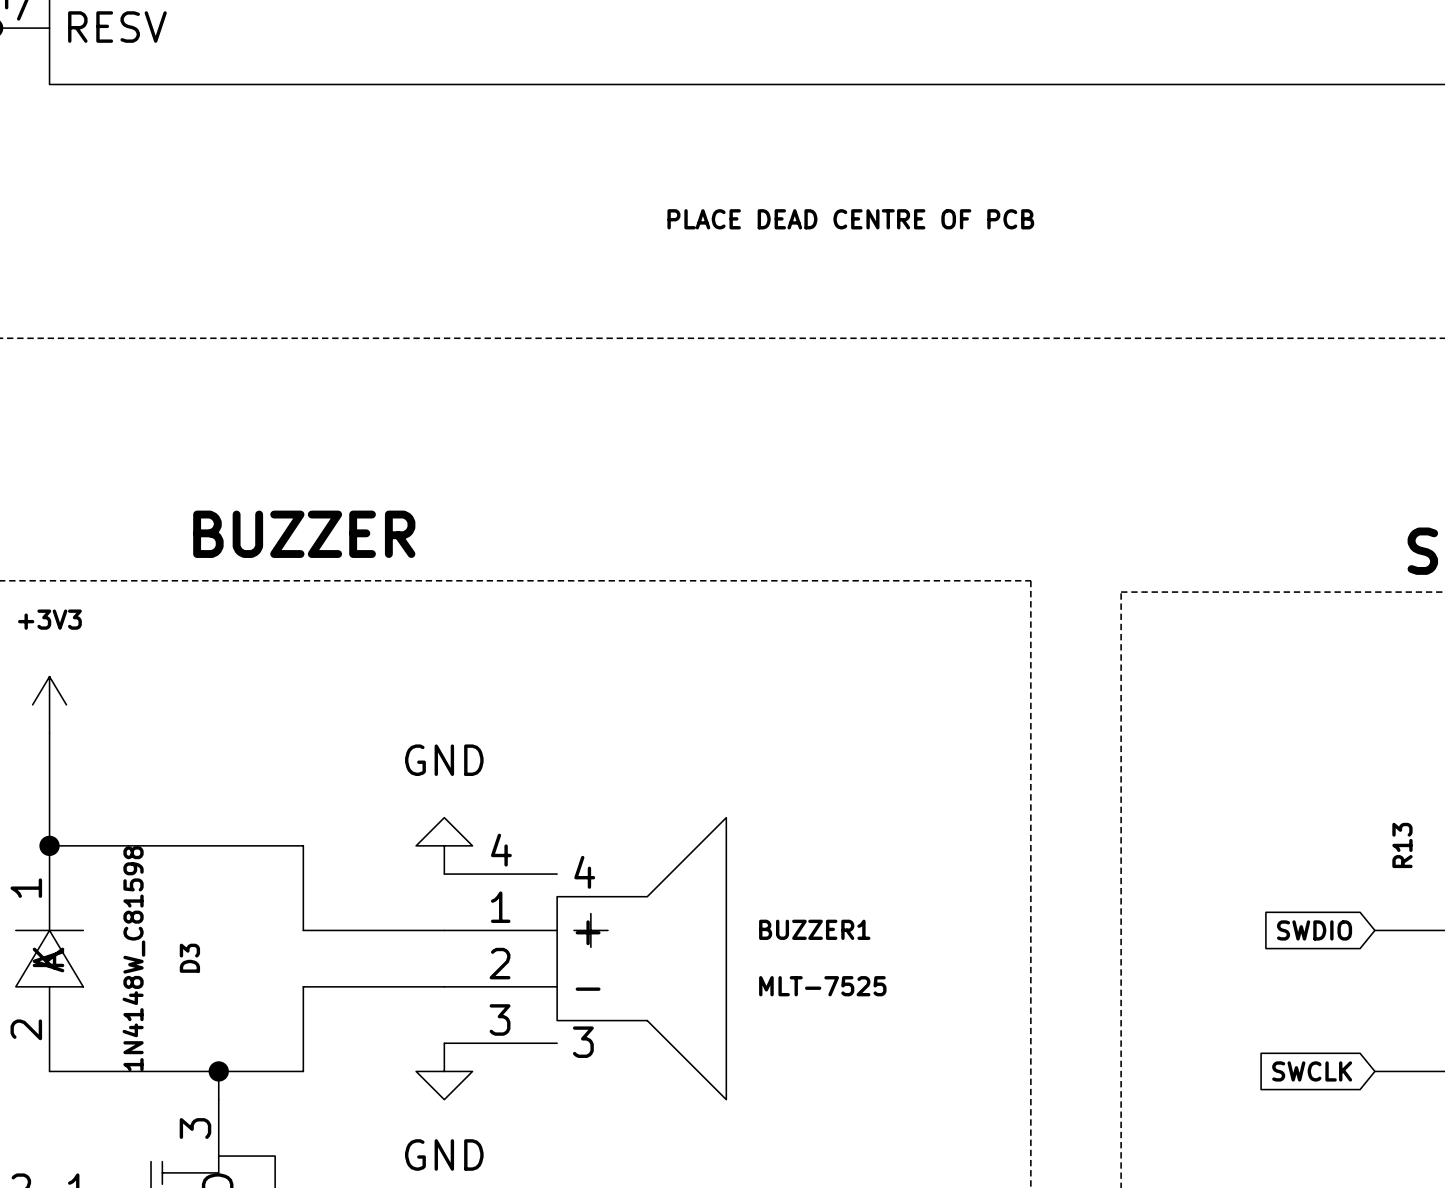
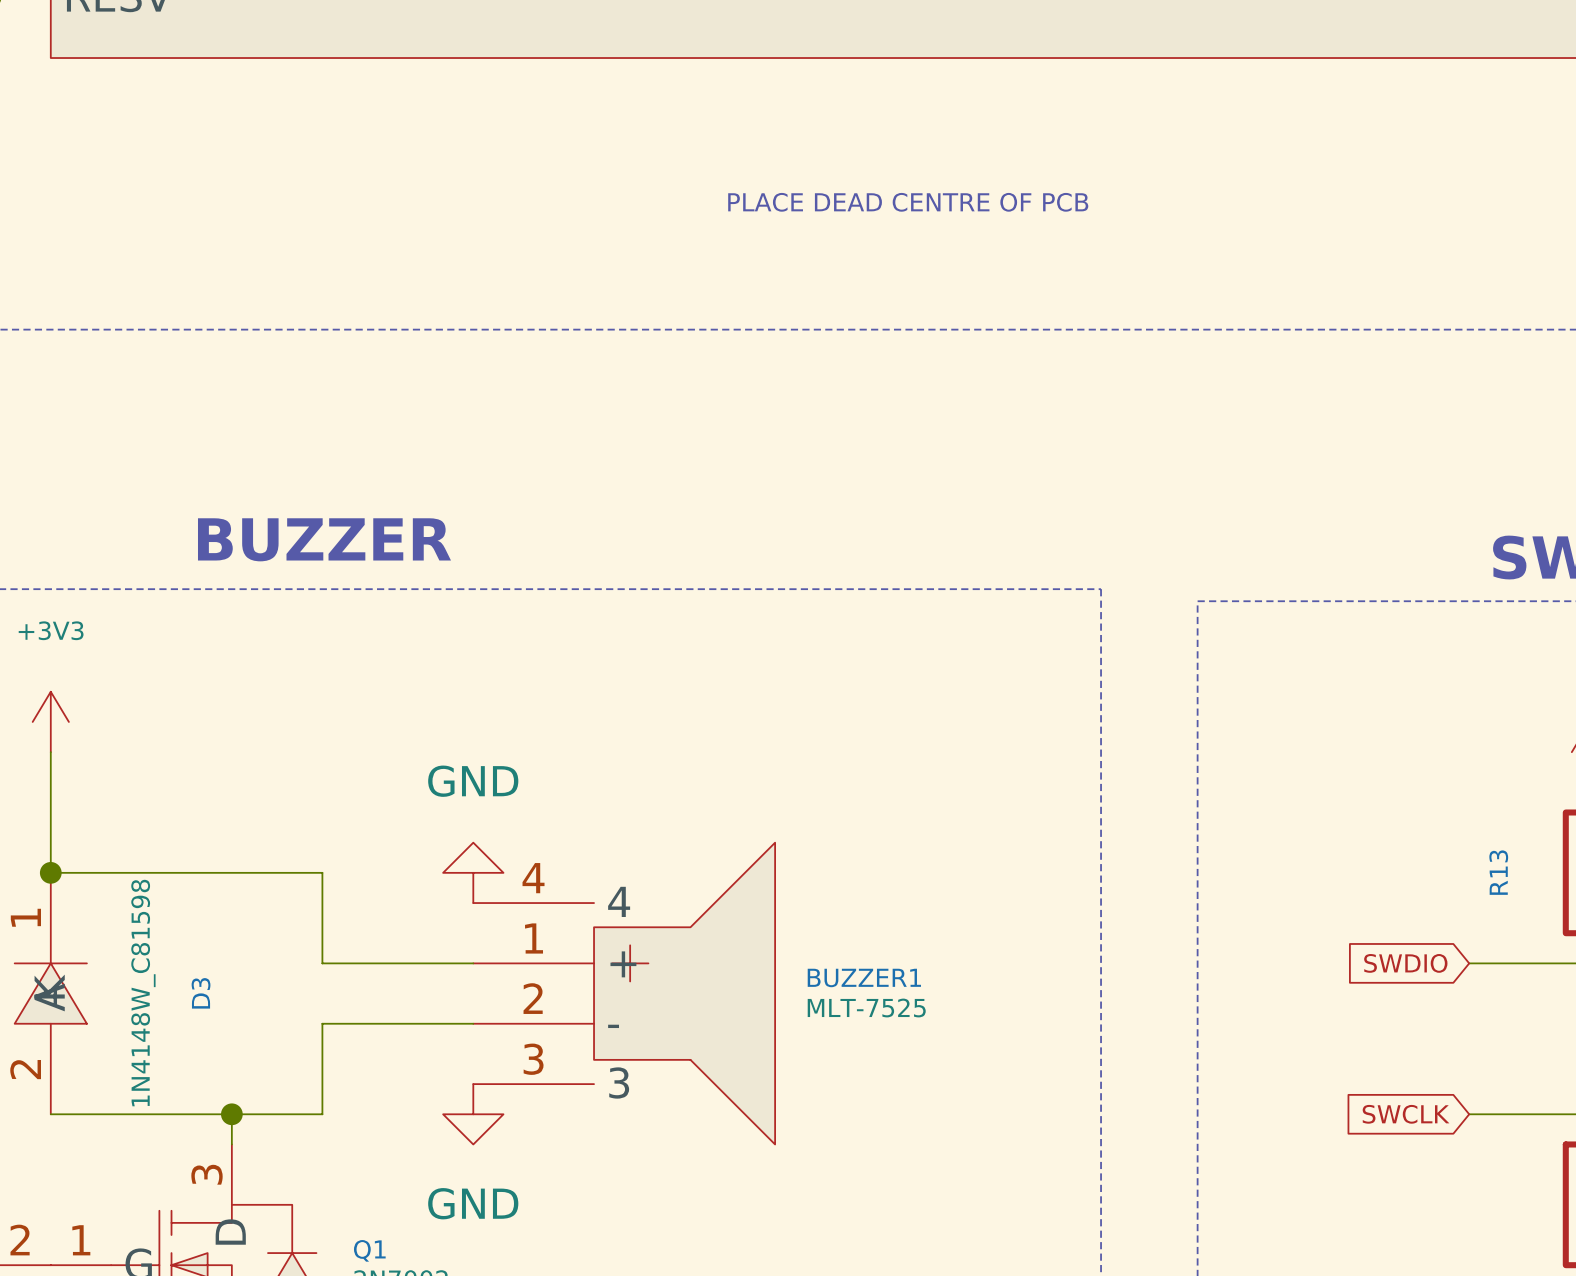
BUZZER1 name position: BUZZER1 (814, 929) -> BUZZER1 (864, 977)
BUZZER1 value position: MLT-7525 (822, 986) -> MLT-7525 (866, 1007)

